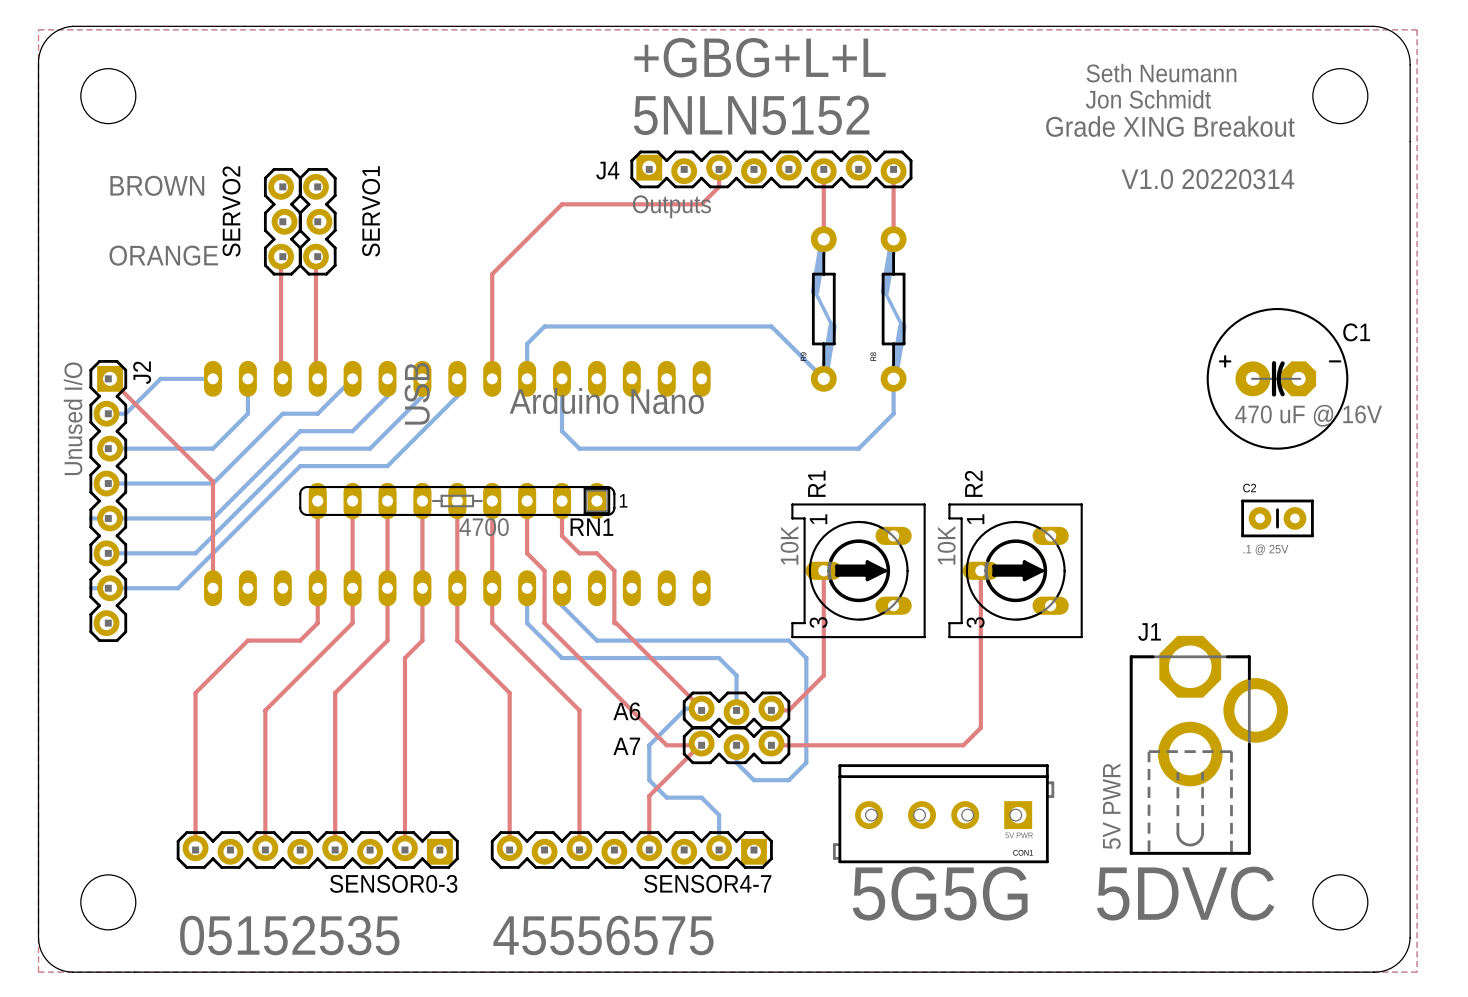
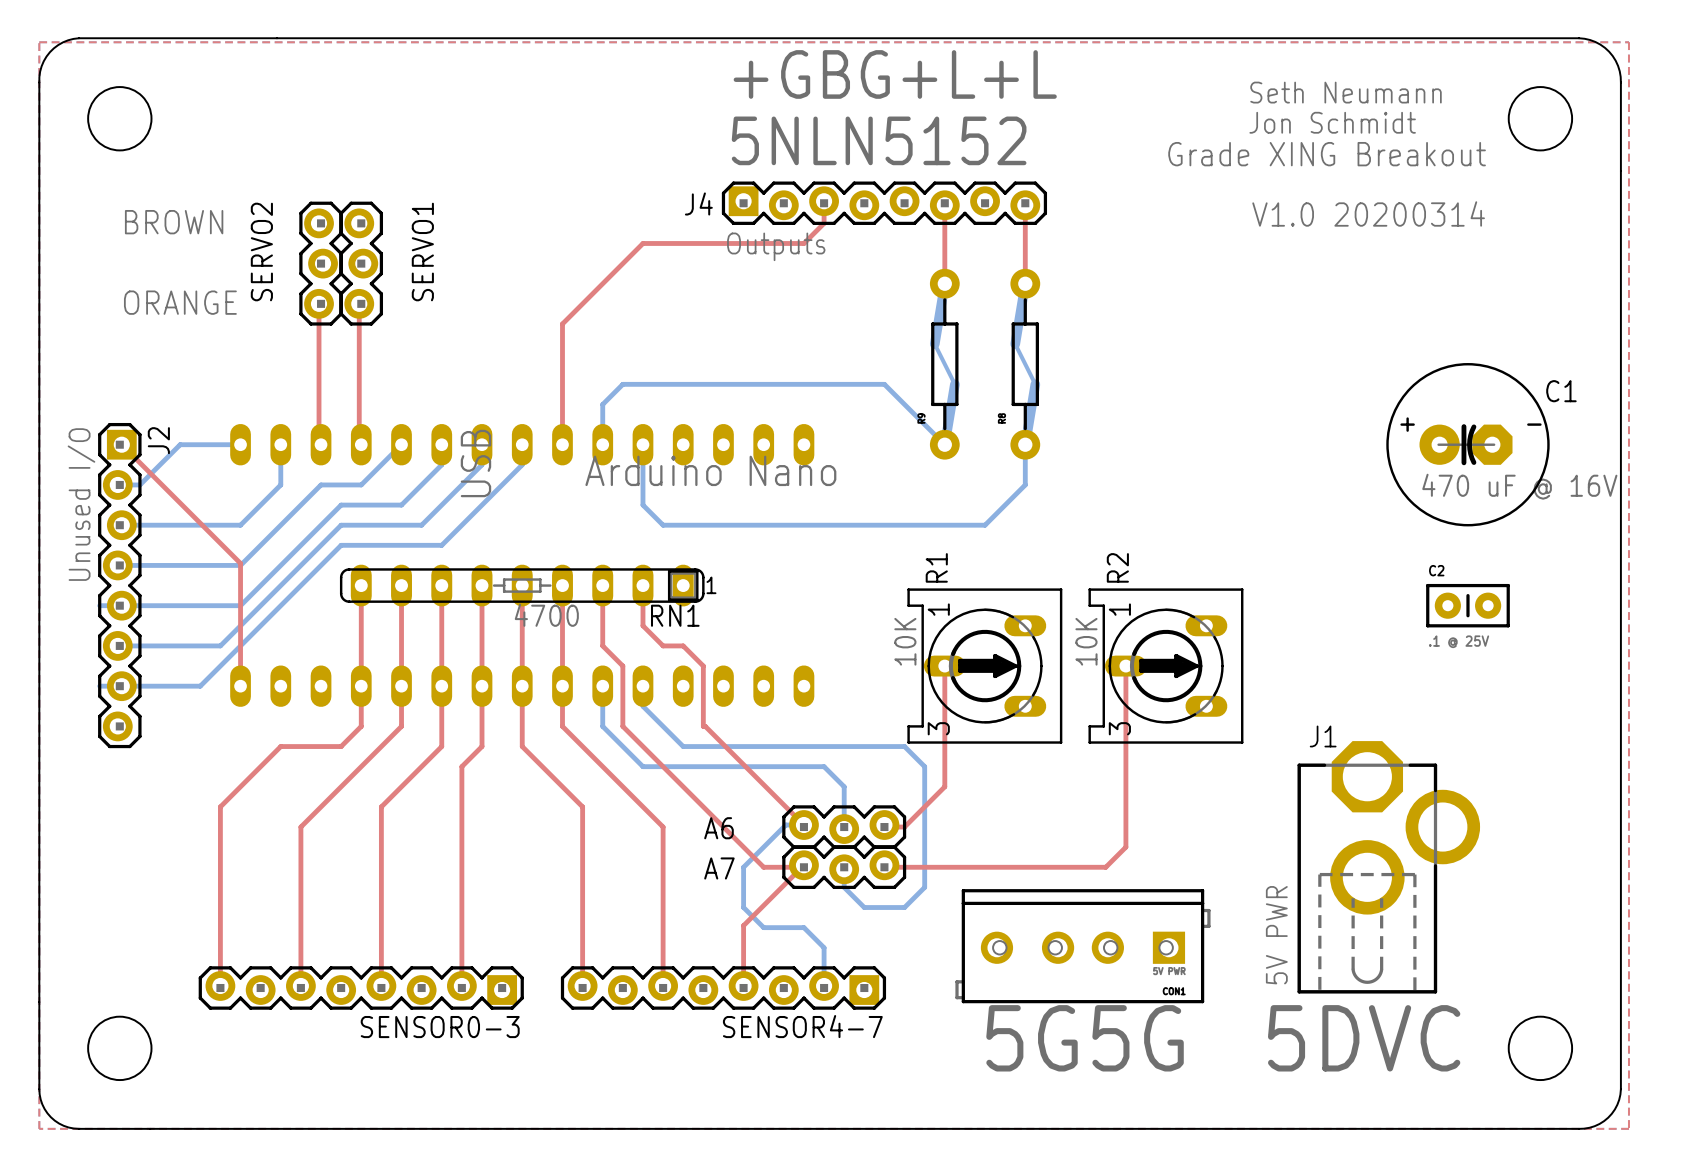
text: V1.0 20220314 (1207, 179) -> V1.0 20200314 (1368, 213)
text: 05152535 (289, 935) -> none
text: 45556575 (603, 935) -> none

